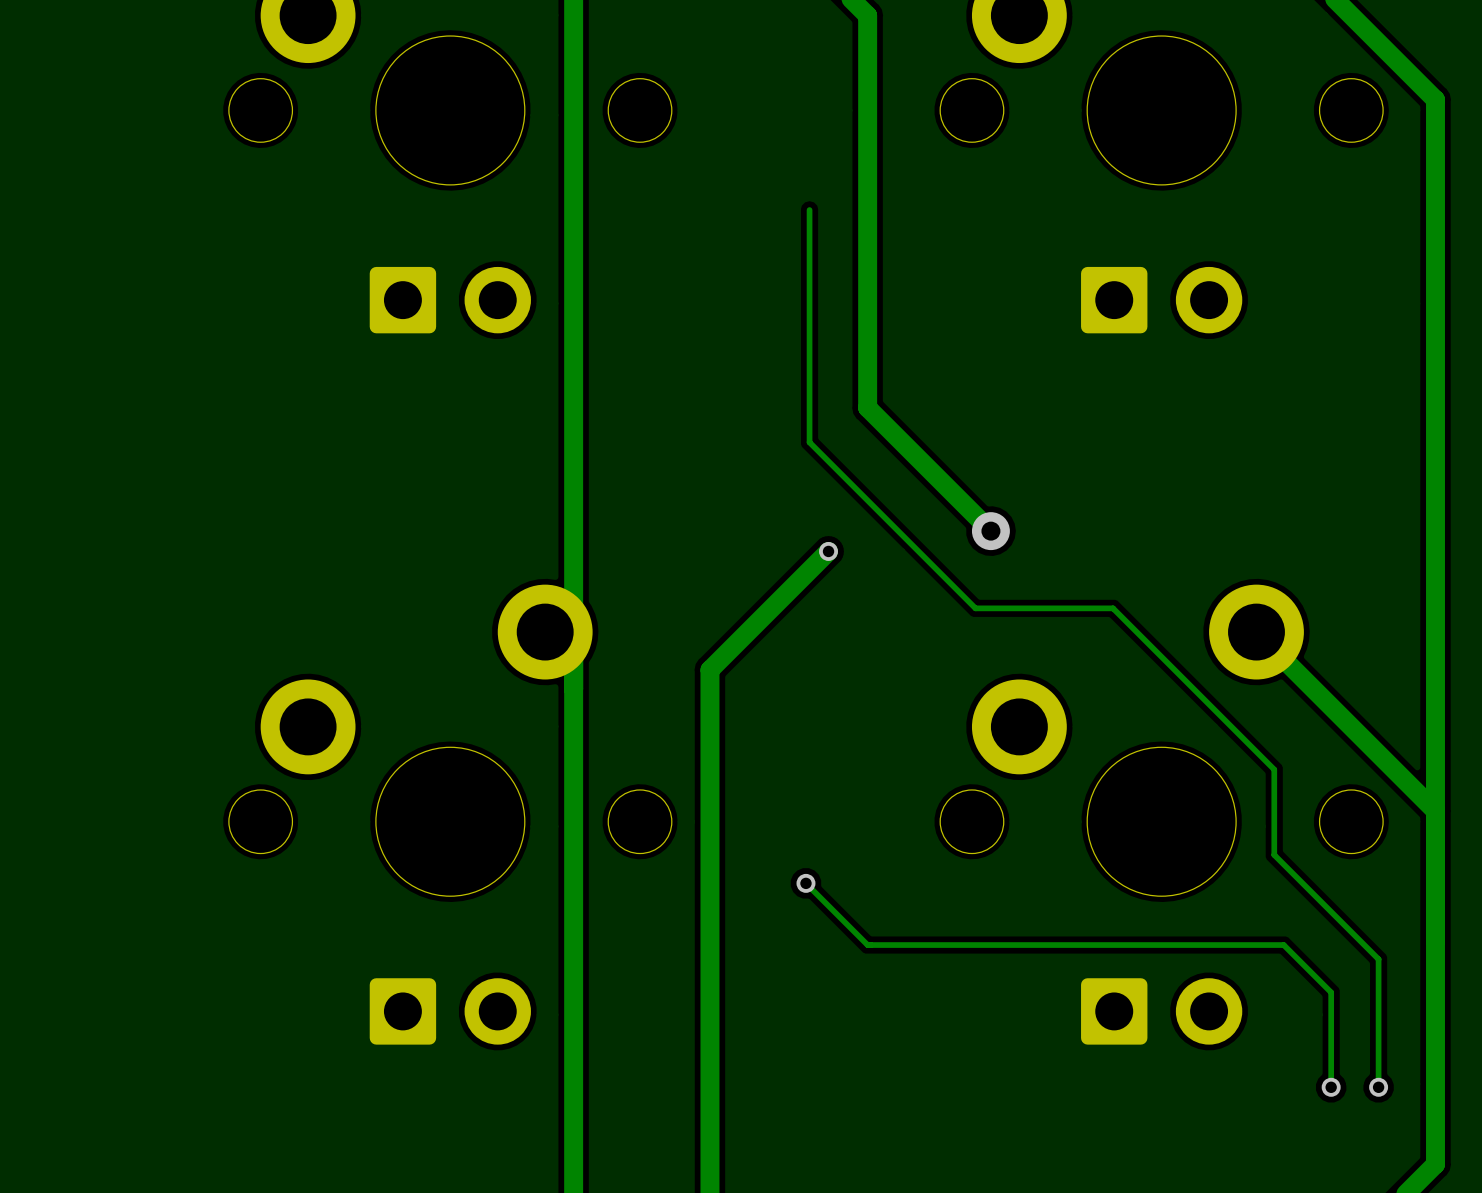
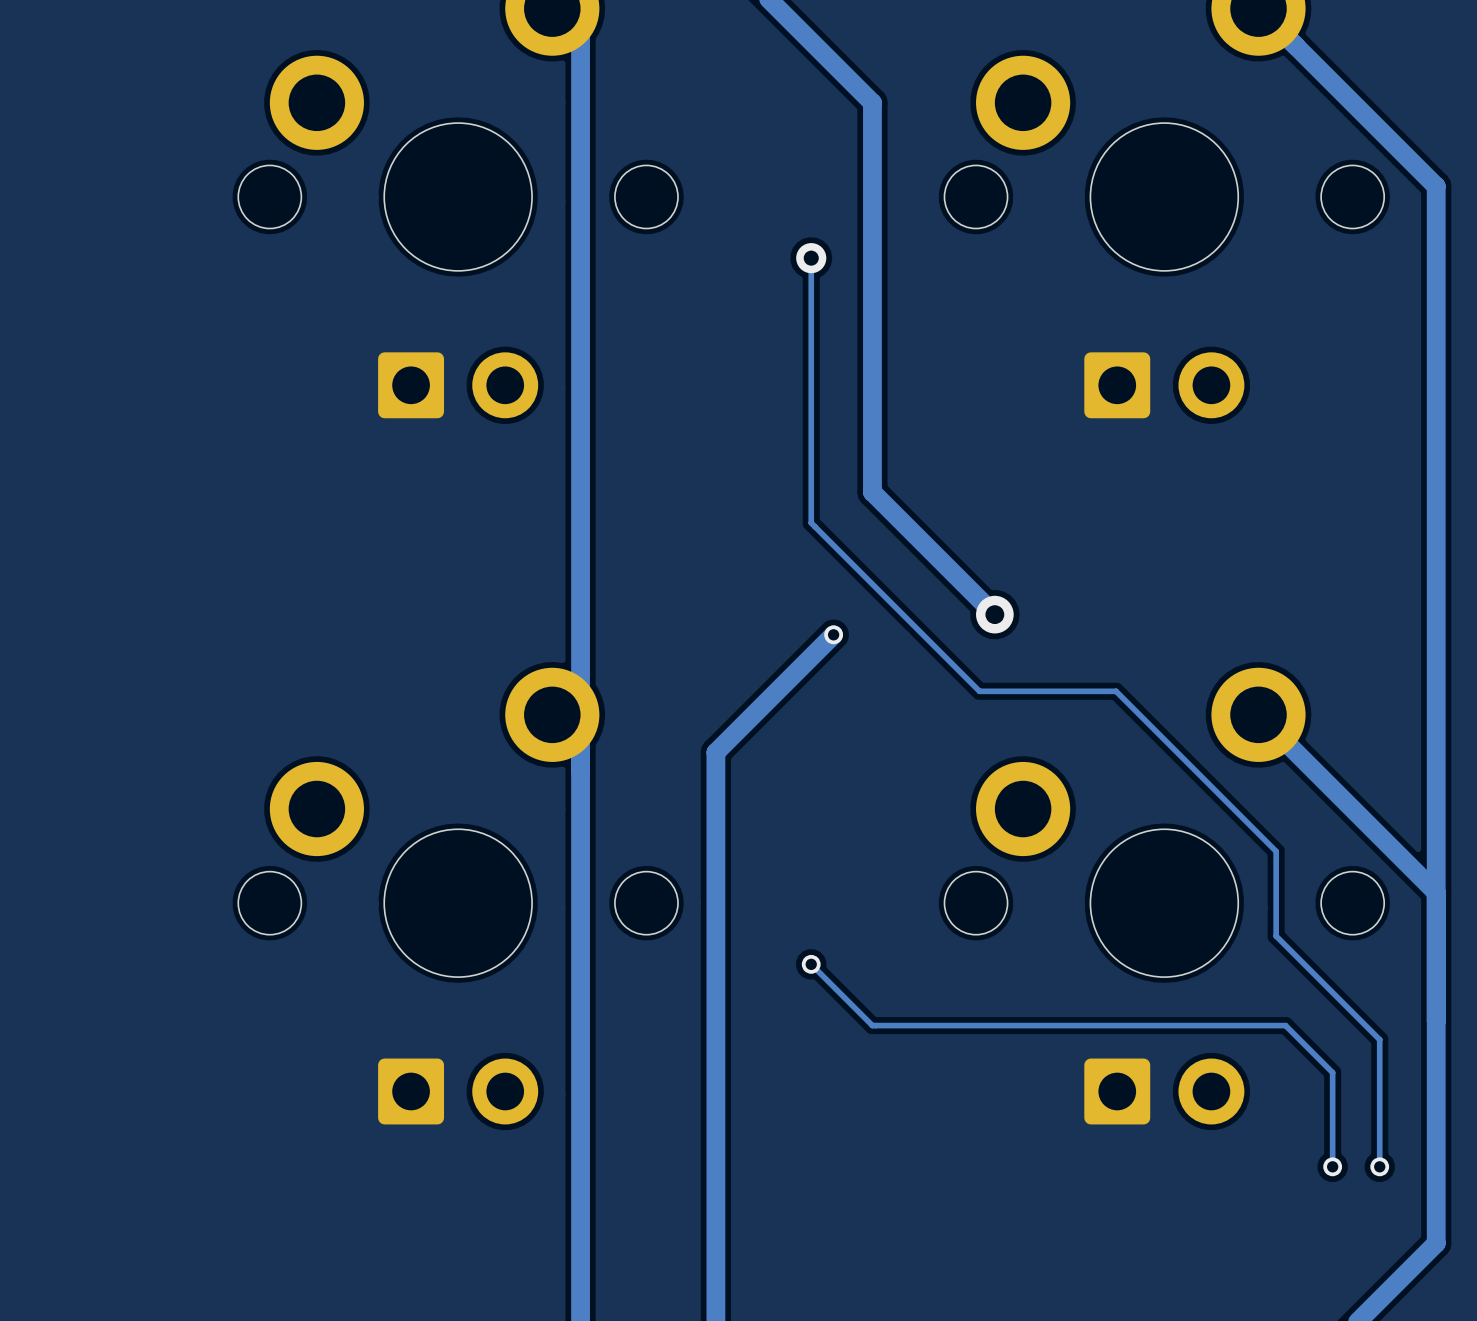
via: none -> (811, 258)
track: (809, 210) (809, 442) -> (811, 258) (811, 523) (814, 526)

